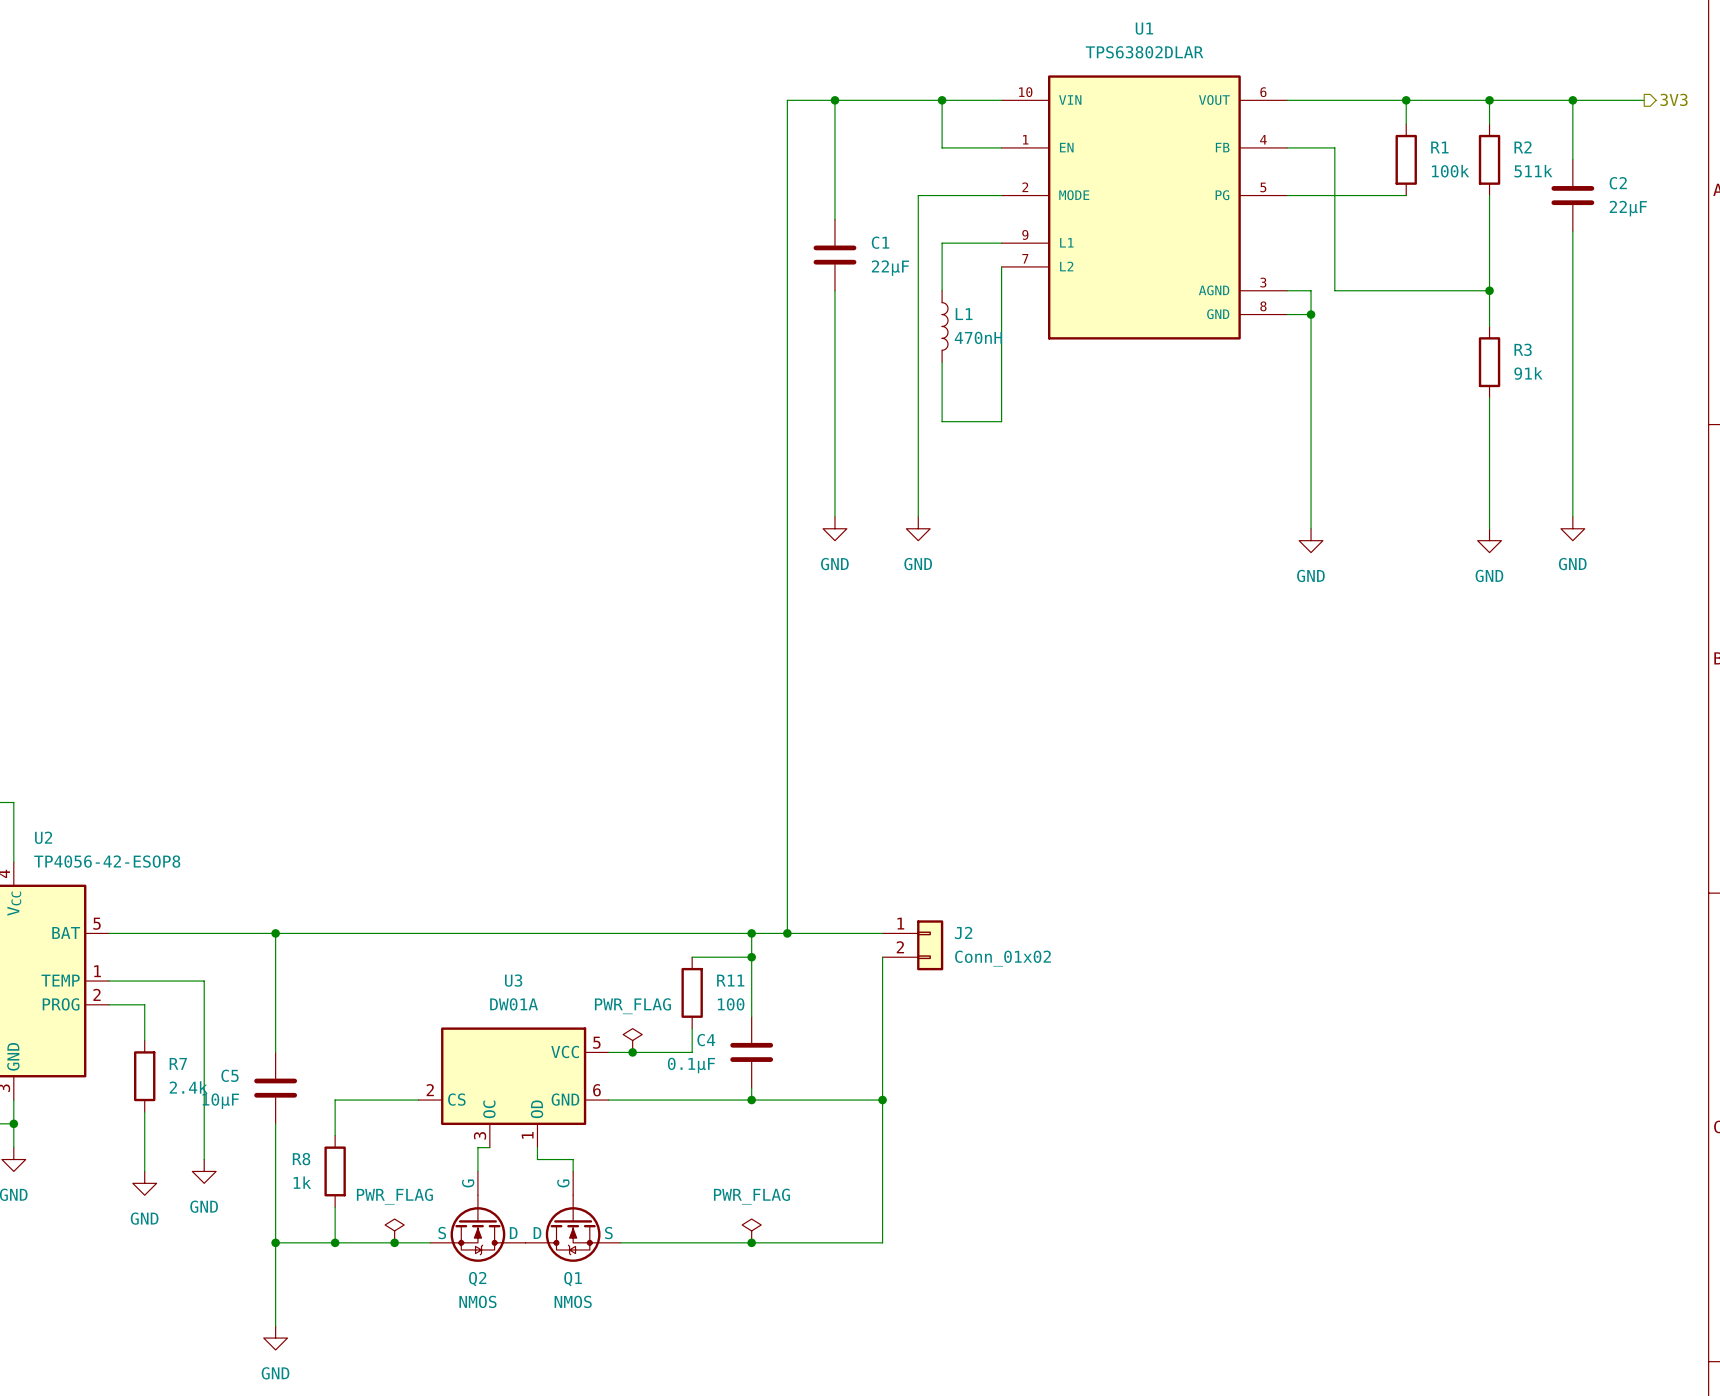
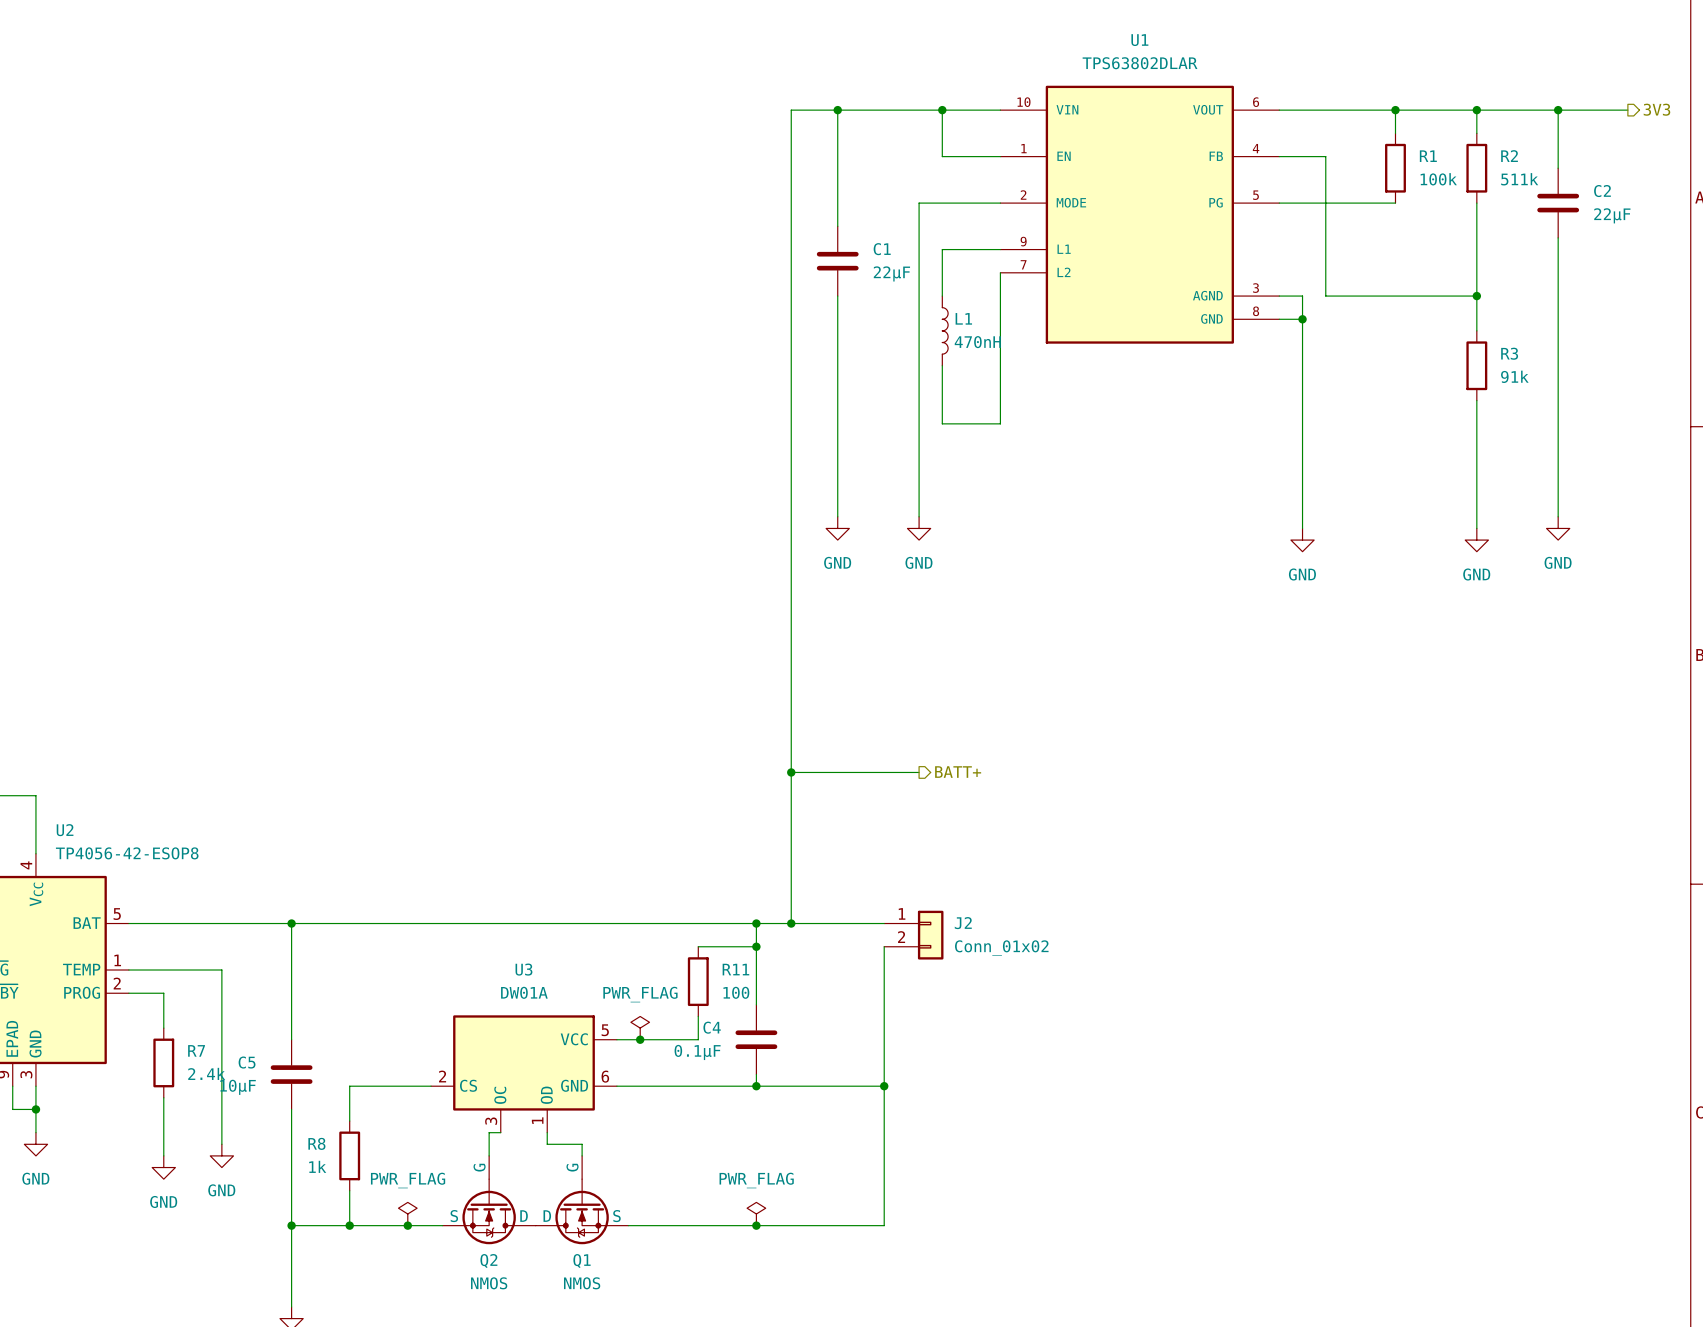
wire: none -> (791, 772) (919, 772)
junction: none -> (791, 772)
hierarchical label: none -> BATT+ (958, 772)

